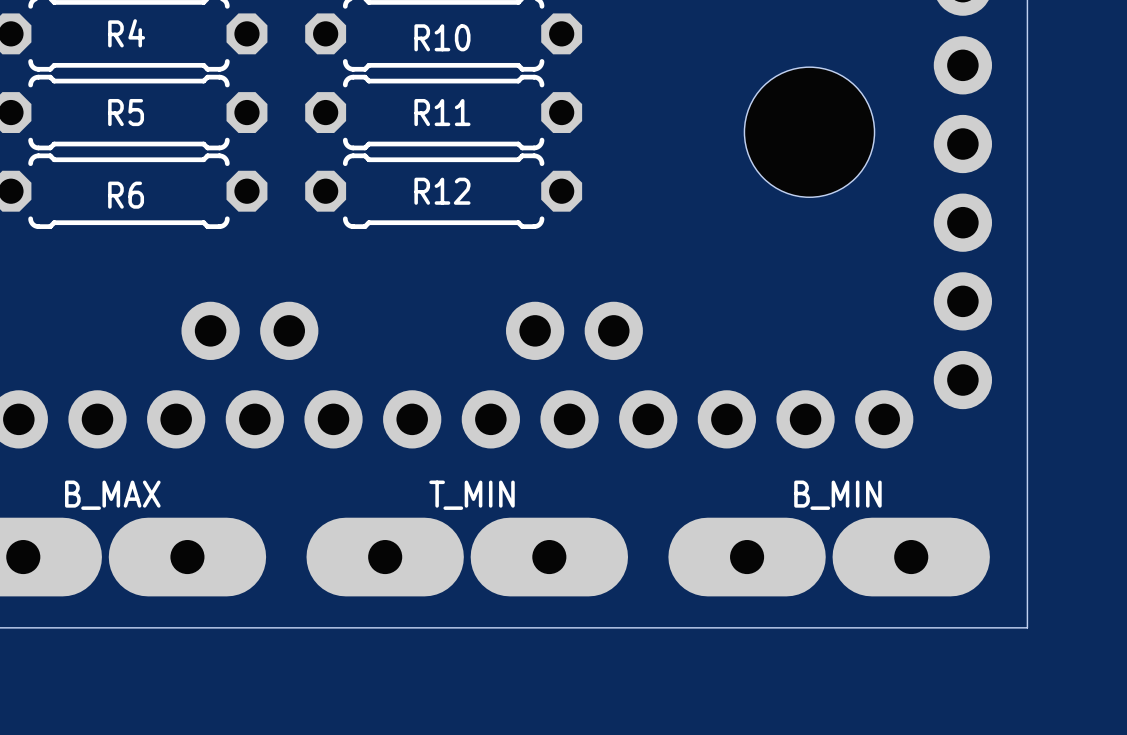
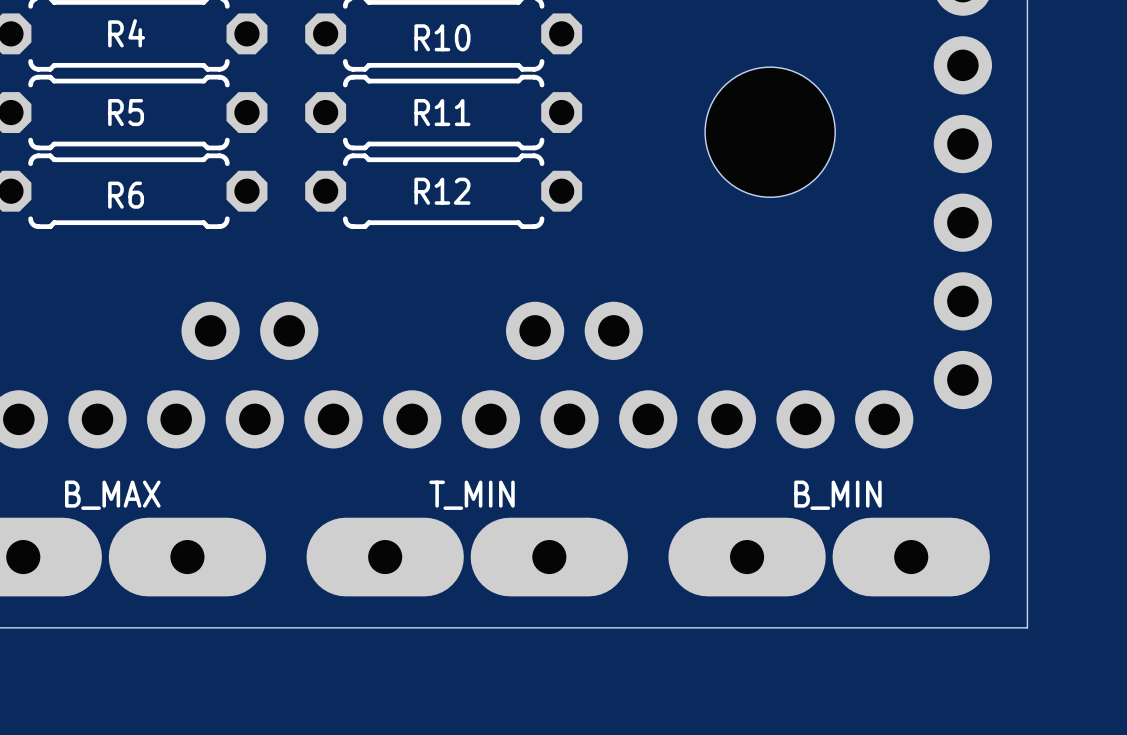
hole position: (809, 132) -> (770, 132)

